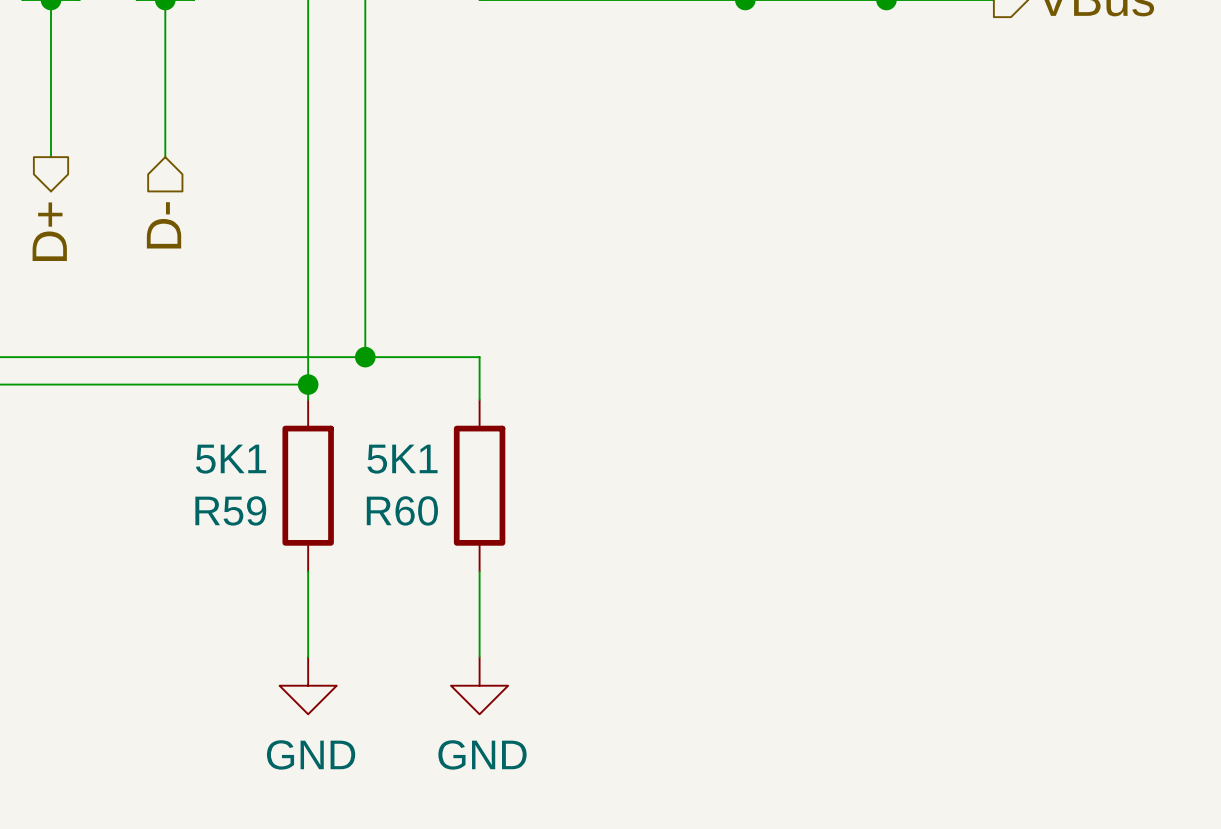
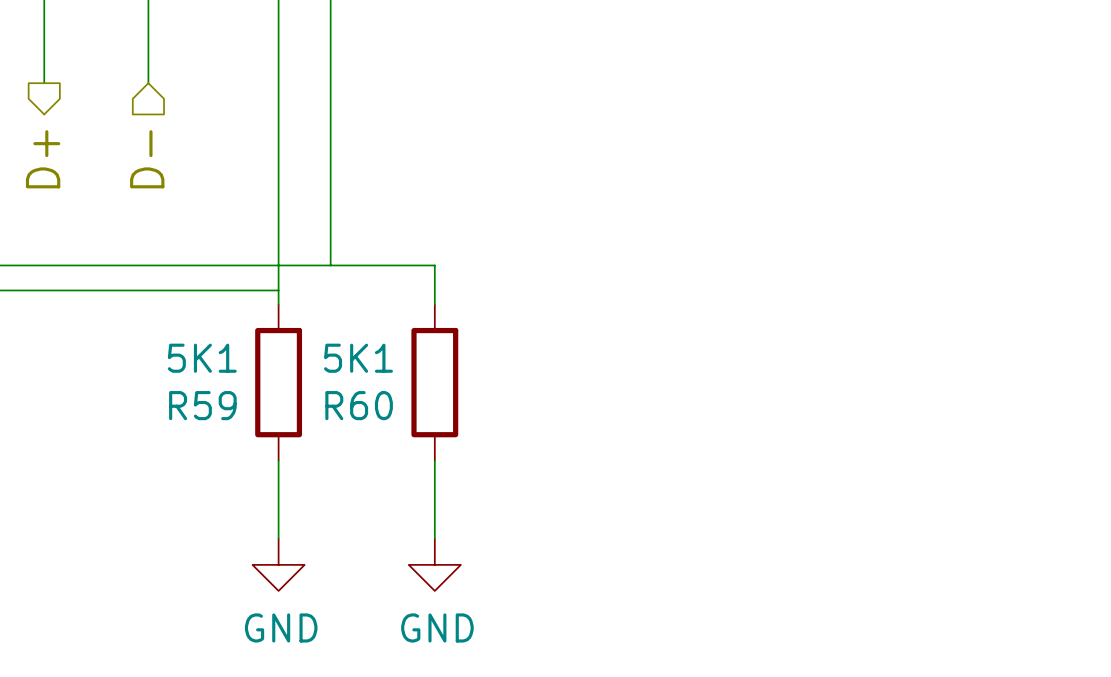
junction: (365, 357) -> none
junction: (308, 384) -> none

